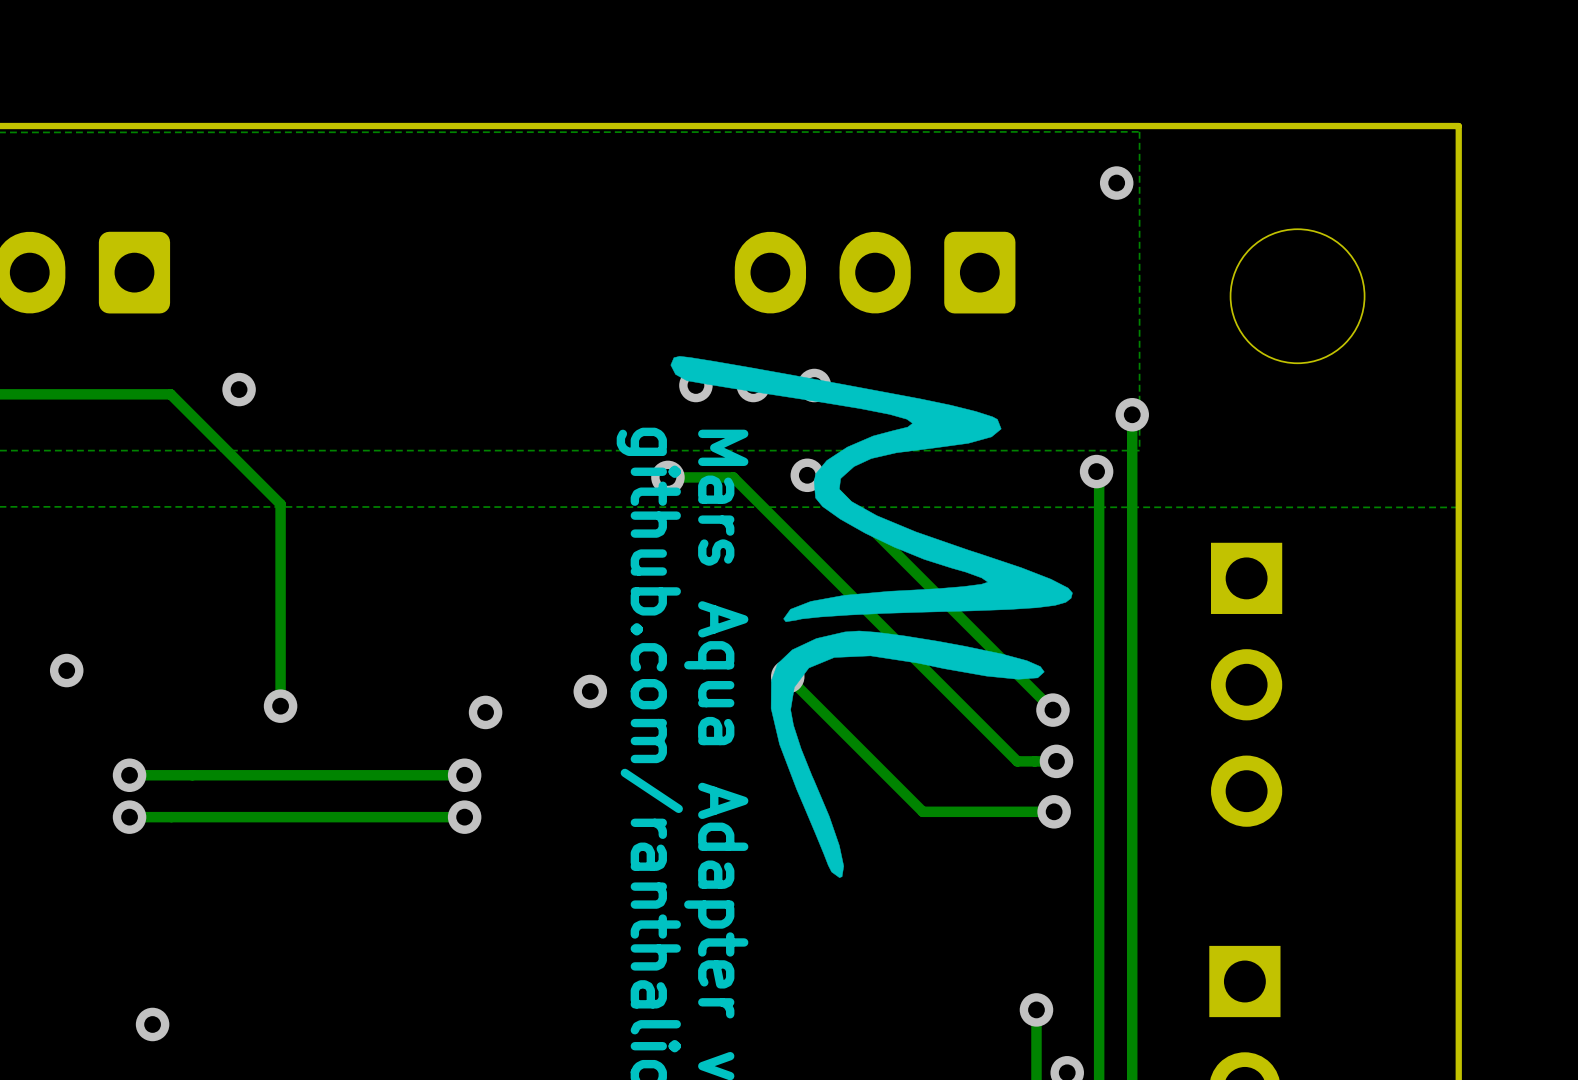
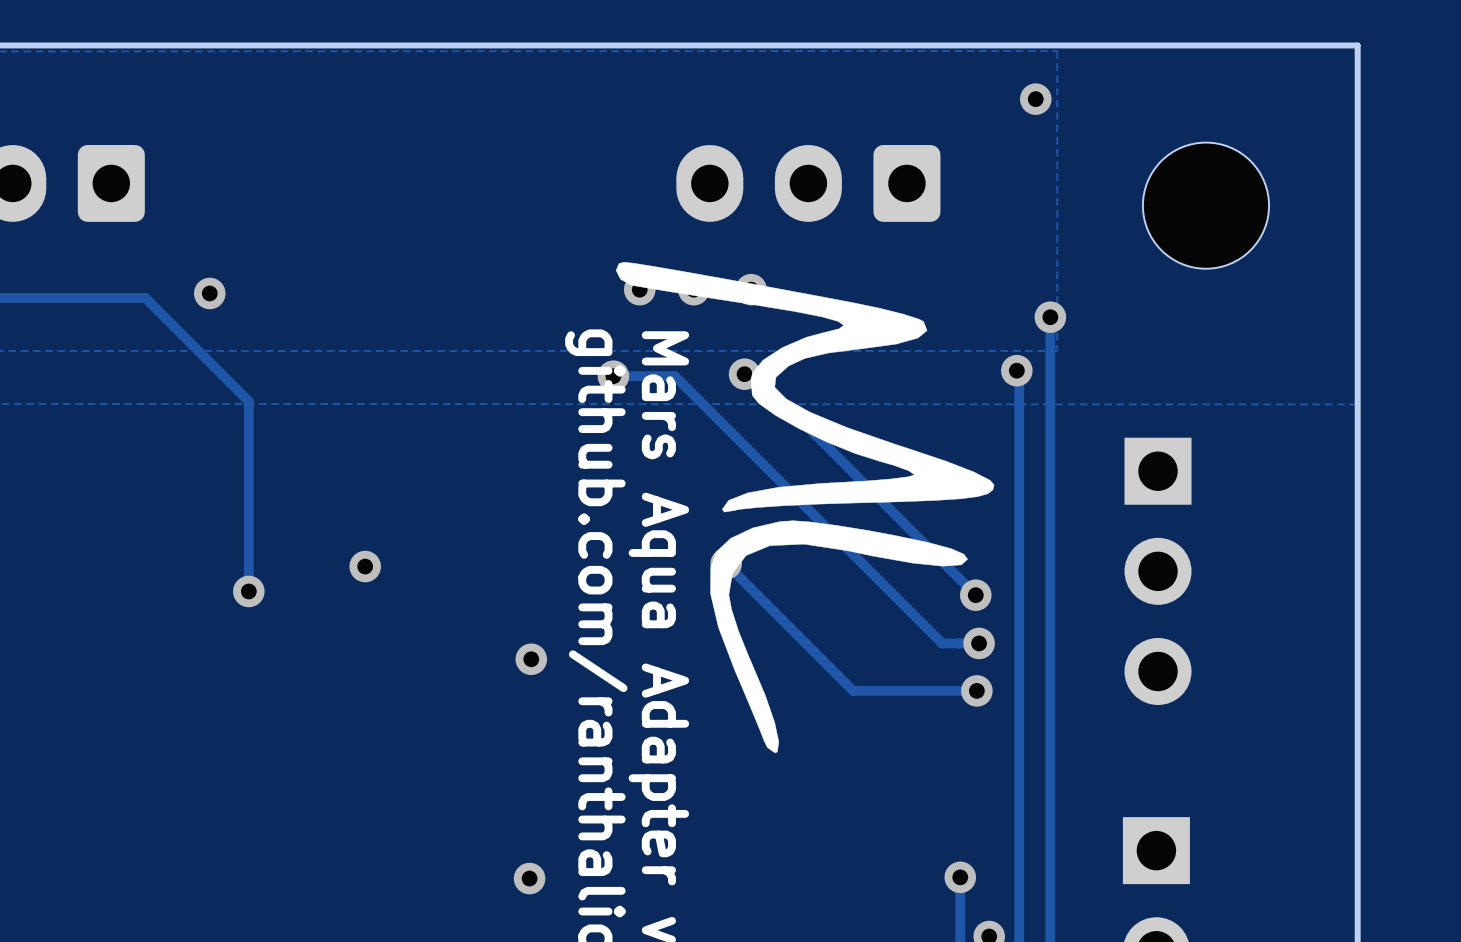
via: (66, 670) -> none
via: none -> (365, 566)
via: (590, 691) -> none
via: (485, 712) -> none
via: (129, 775) -> none
track: (464, 775) (129, 775) -> none
via: (464, 775) -> none
via: none -> (531, 659)
via: (129, 817) -> none
track: (464, 817) (129, 817) -> none
via: (464, 817) -> none
via: none -> (529, 878)
via: (152, 1024) -> none

